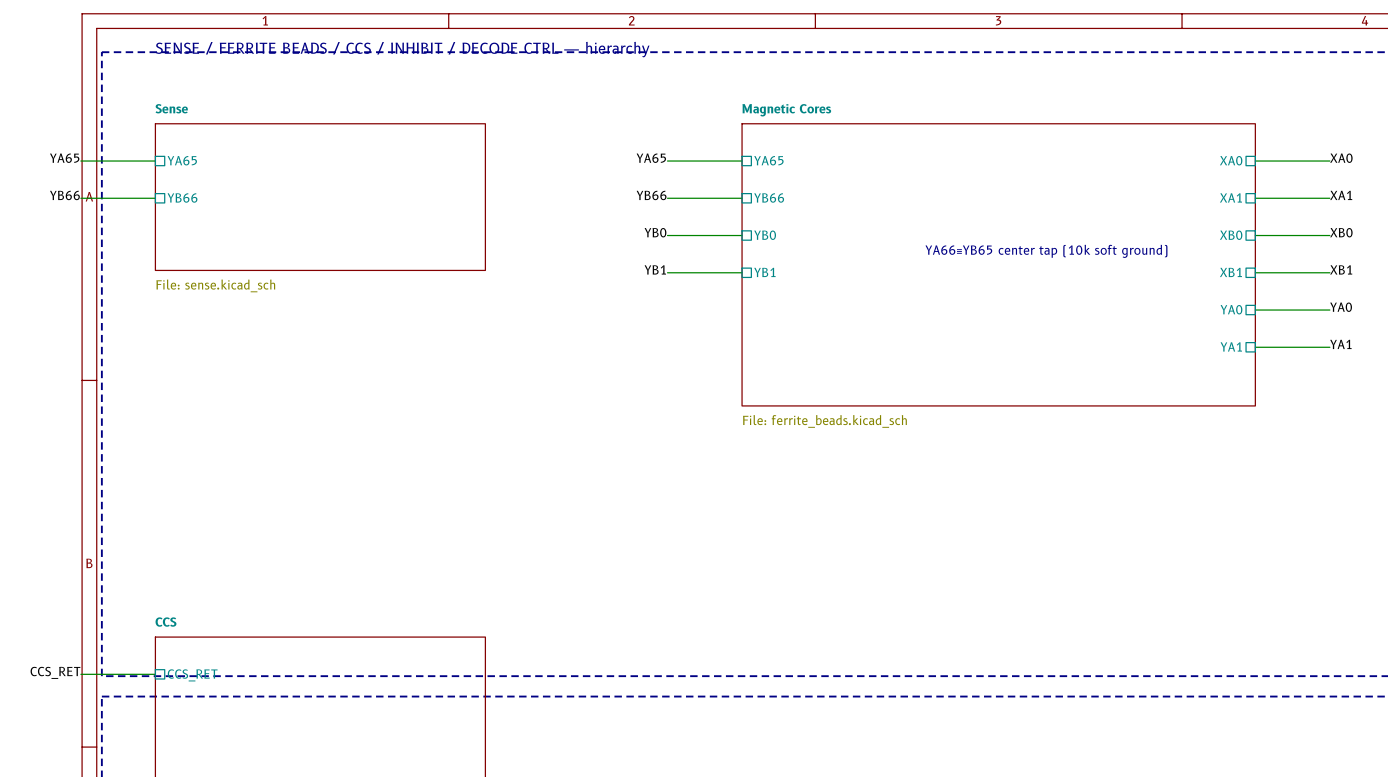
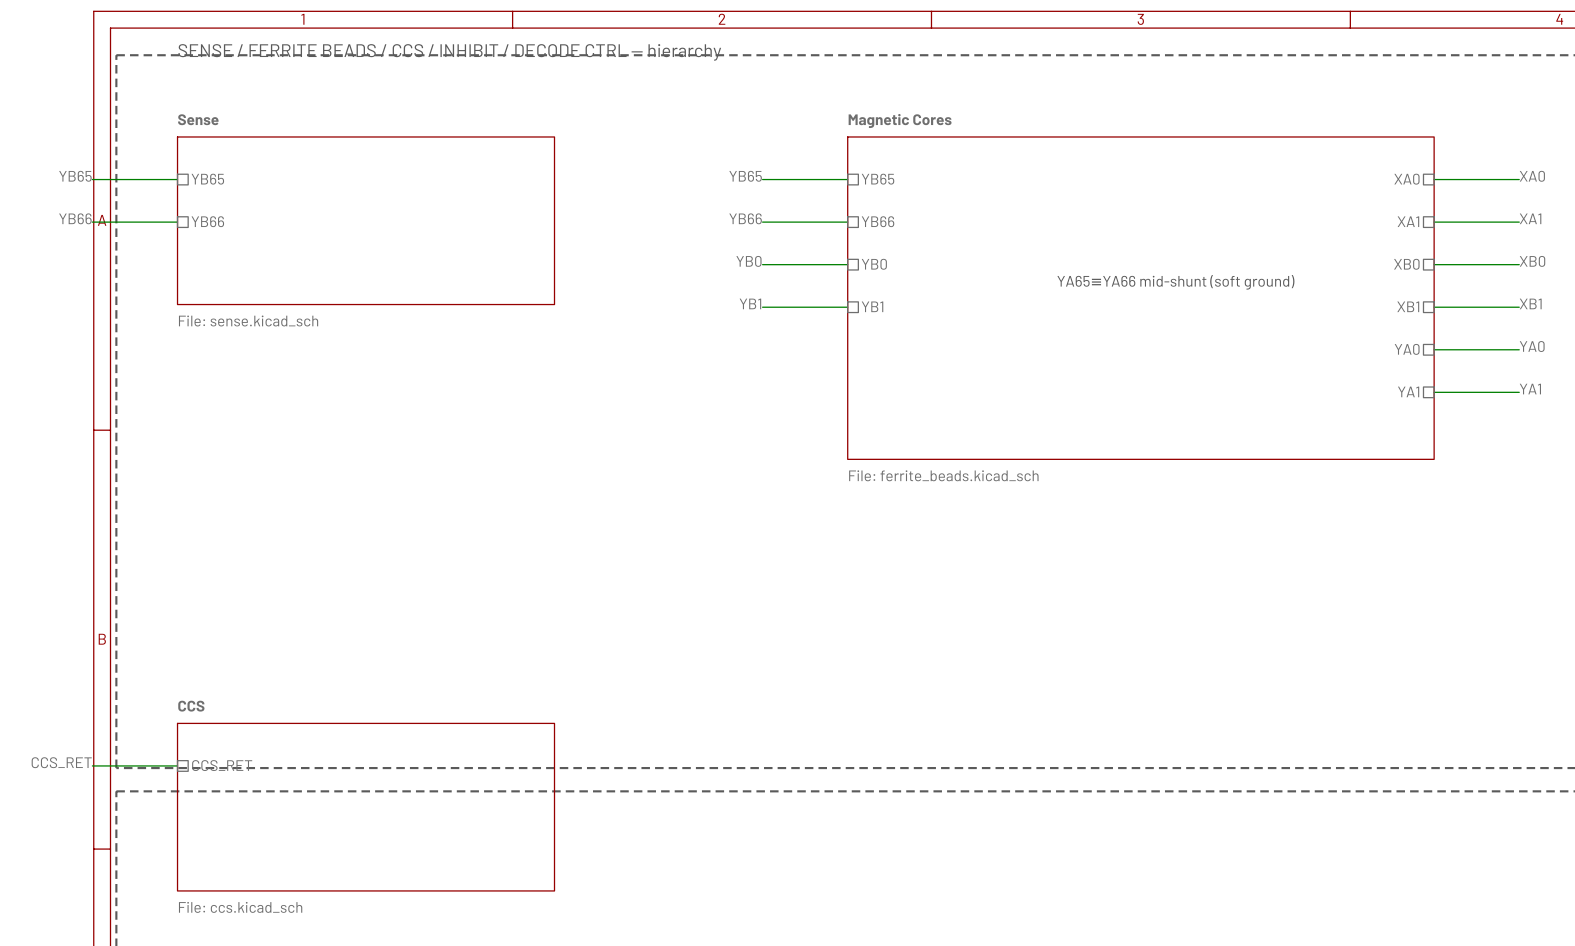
label: YA65 (64, 158) -> YB65 (75, 176)
label: YA65 (651, 158) -> YB65 (745, 176)
sheet pin: YA65 (182, 160) -> YB65 (207, 179)
sheet pin: YA65 (768, 160) -> YB65 (878, 179)
text: YA66≡YB65 center tap (10k soft ground) (1046, 251) -> YA65≡YA66 mid-shunt (soft ground) (1175, 282)

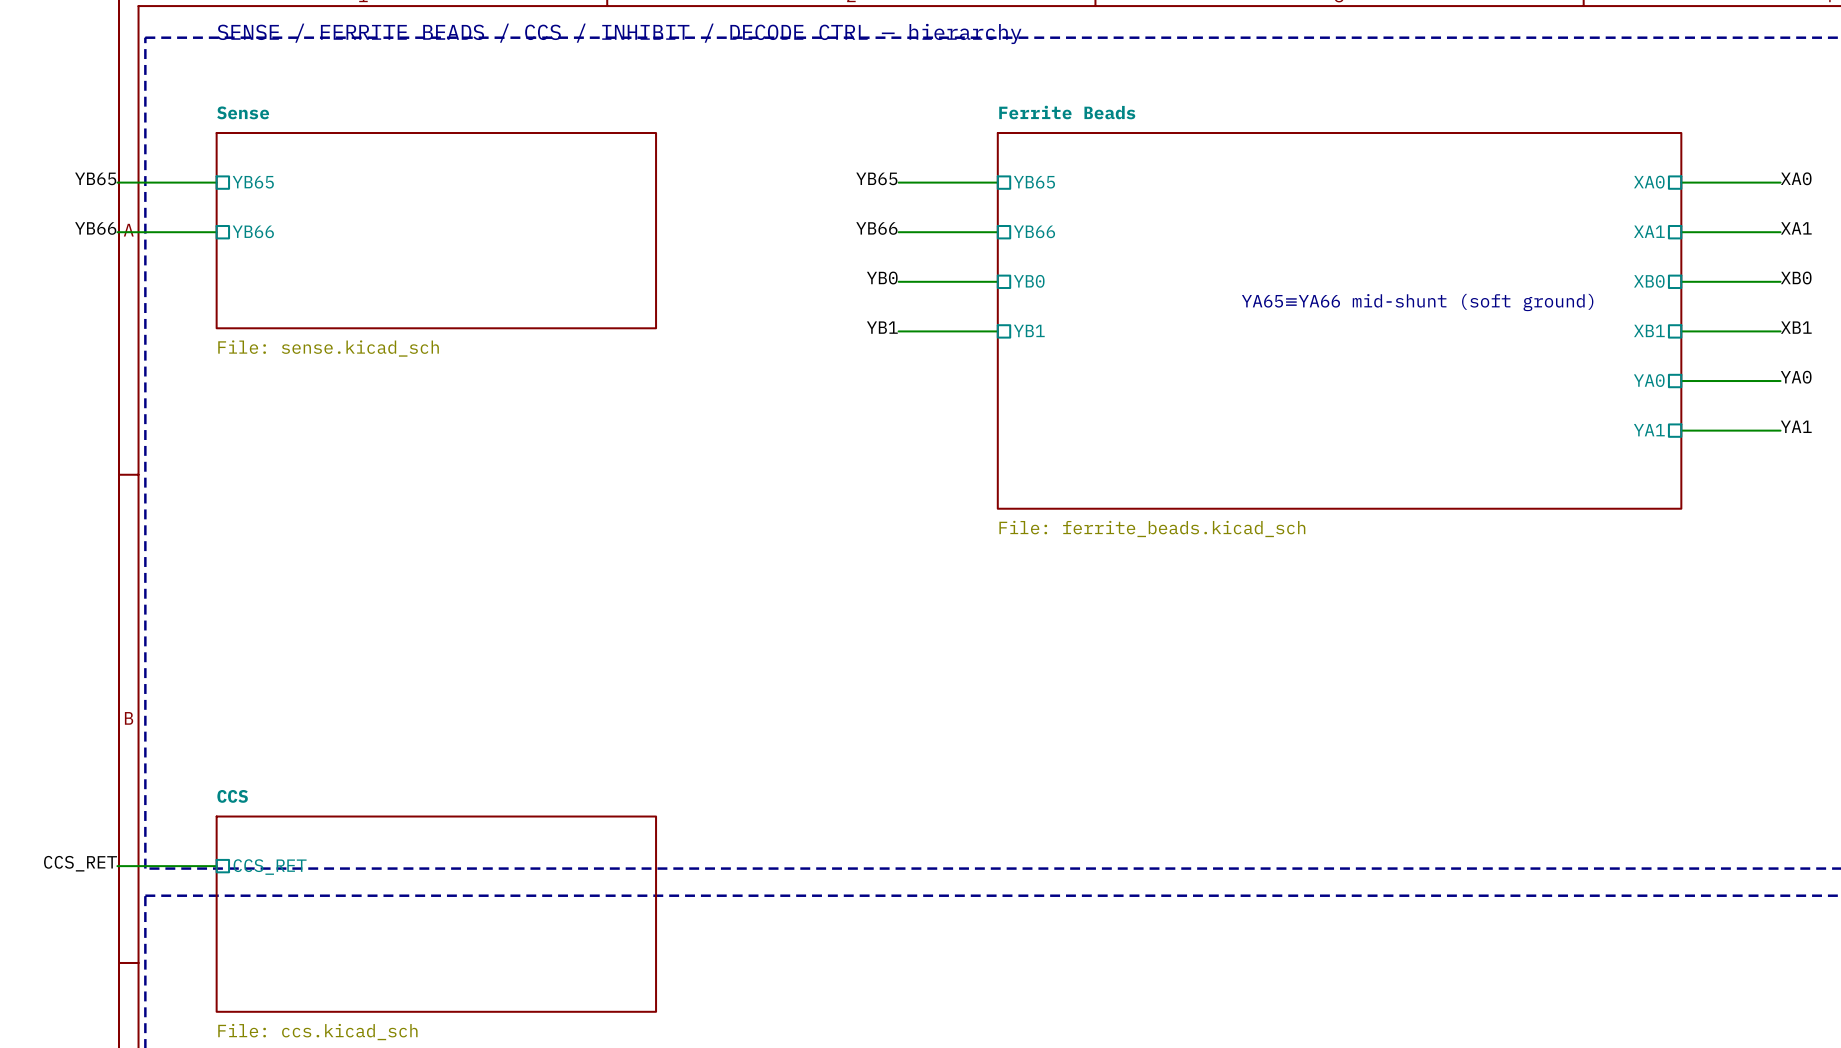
sheet Magnetic Cores name: Magnetic Cores (900, 121) -> Ferrite Beads (1067, 112)

